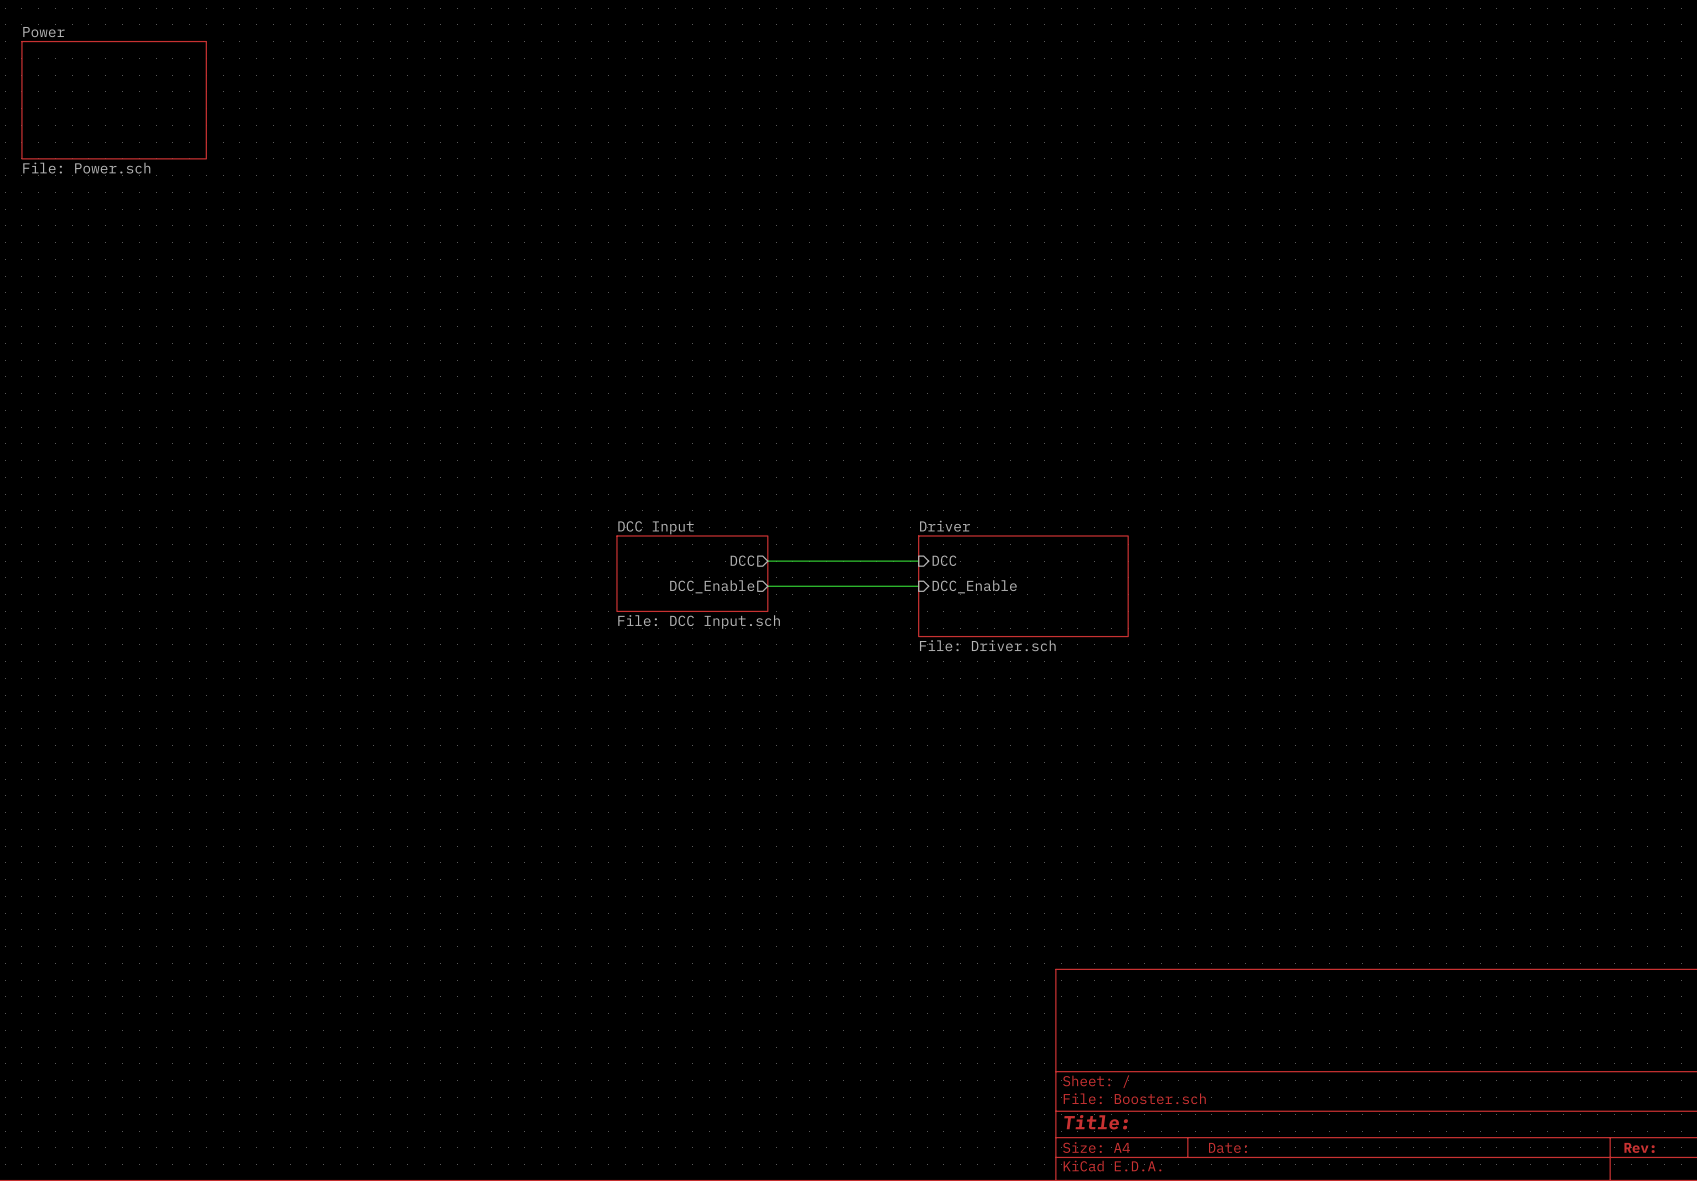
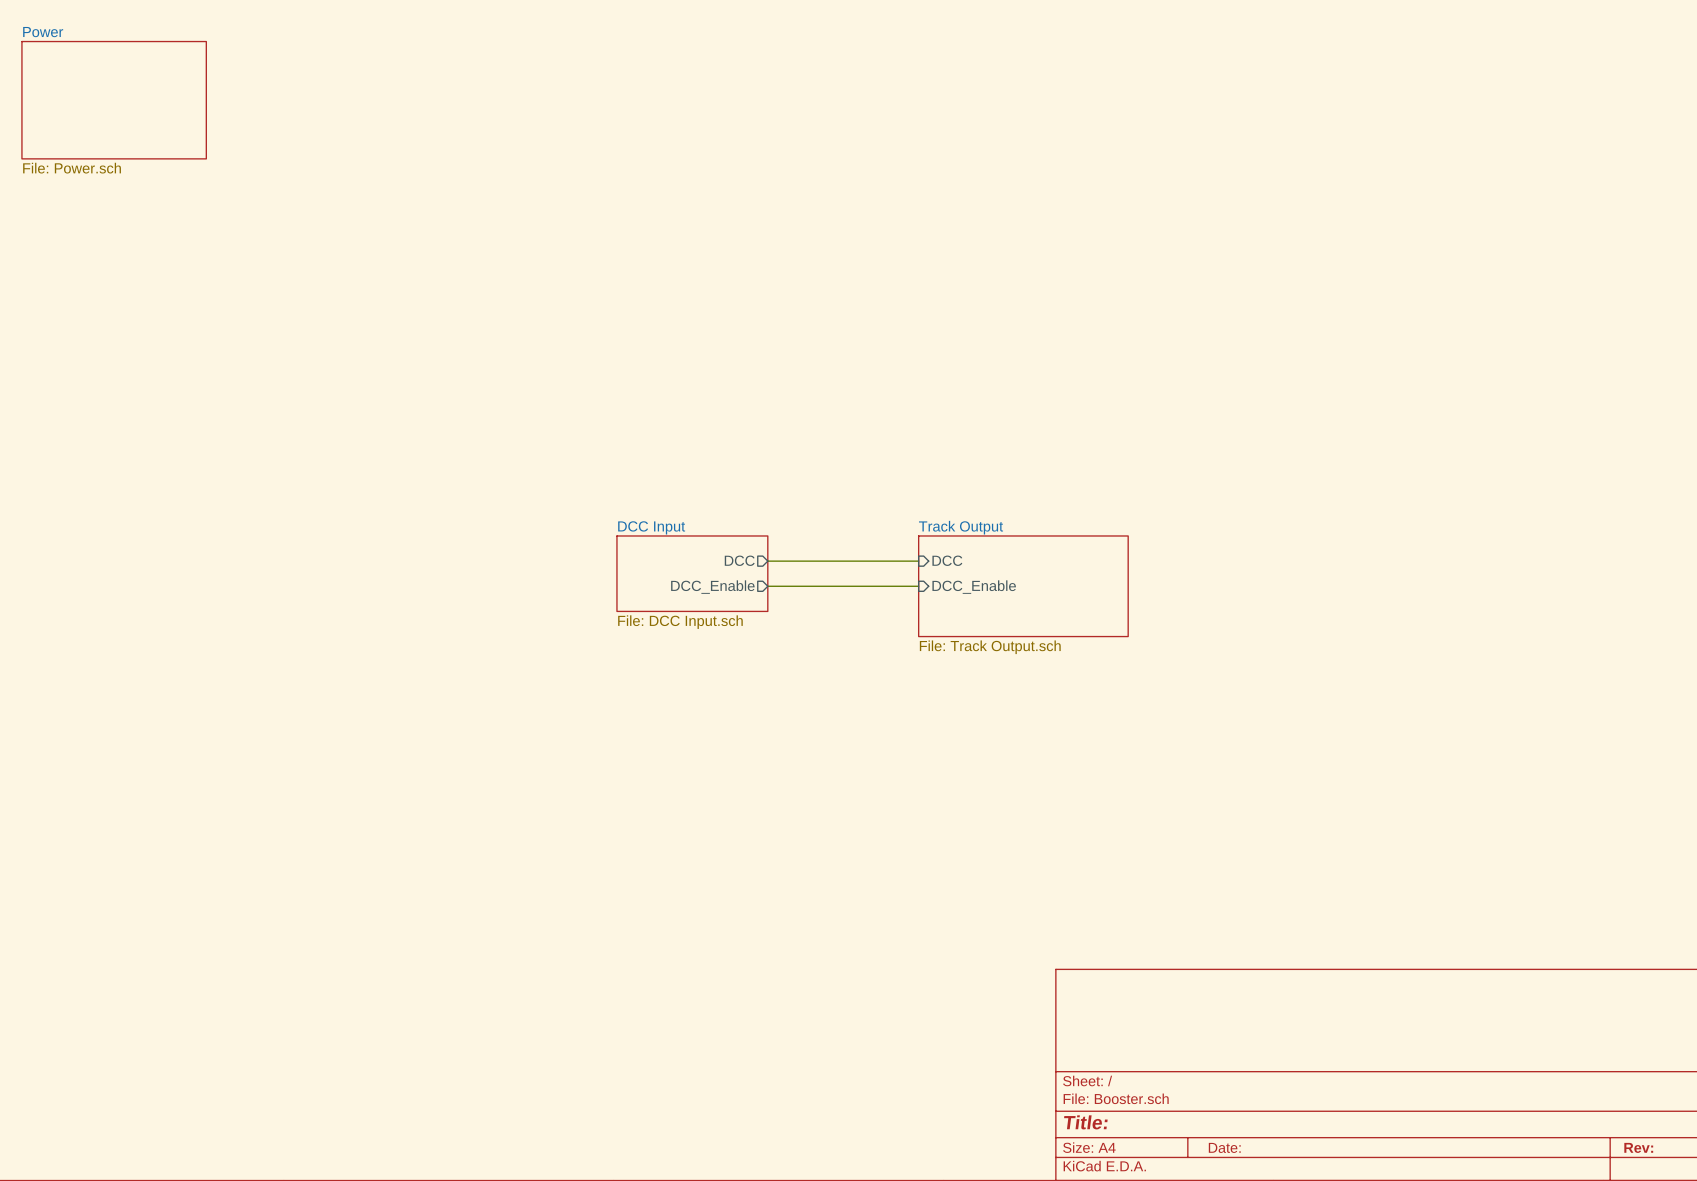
sheet Driver name: Driver (944, 526) -> Track Output (961, 527)
sheet Driver value: File: Driver.sch (987, 645) -> File: Track Output.sch (990, 647)

